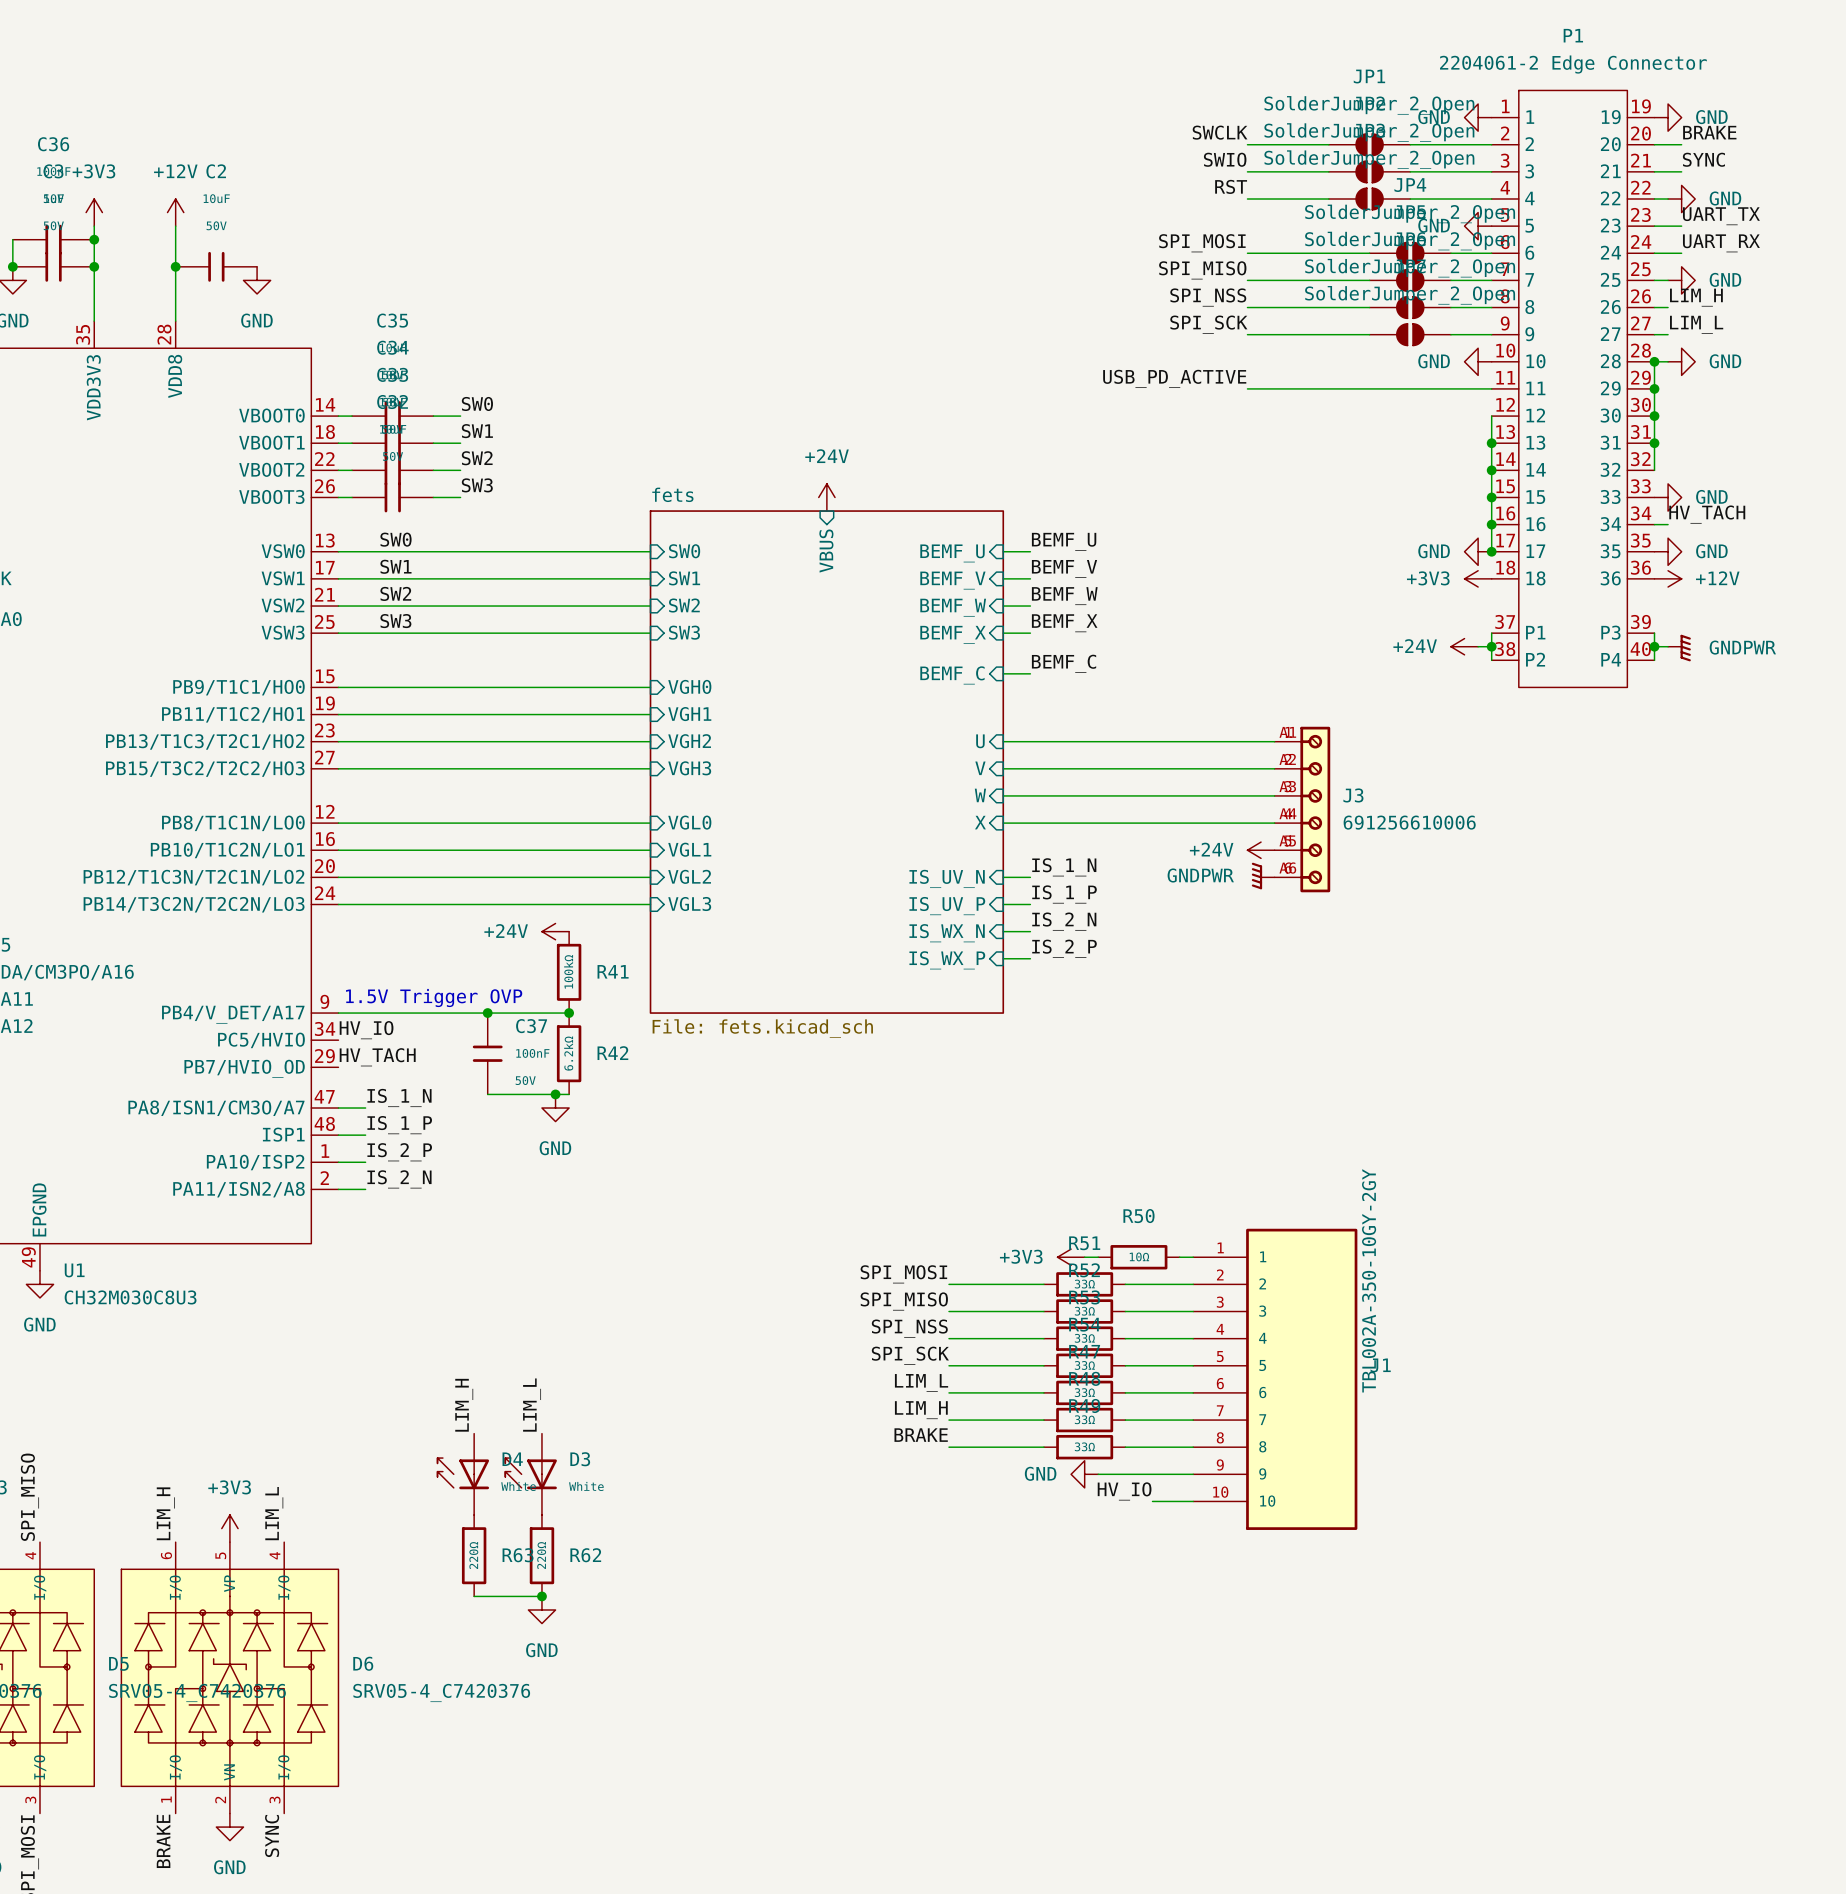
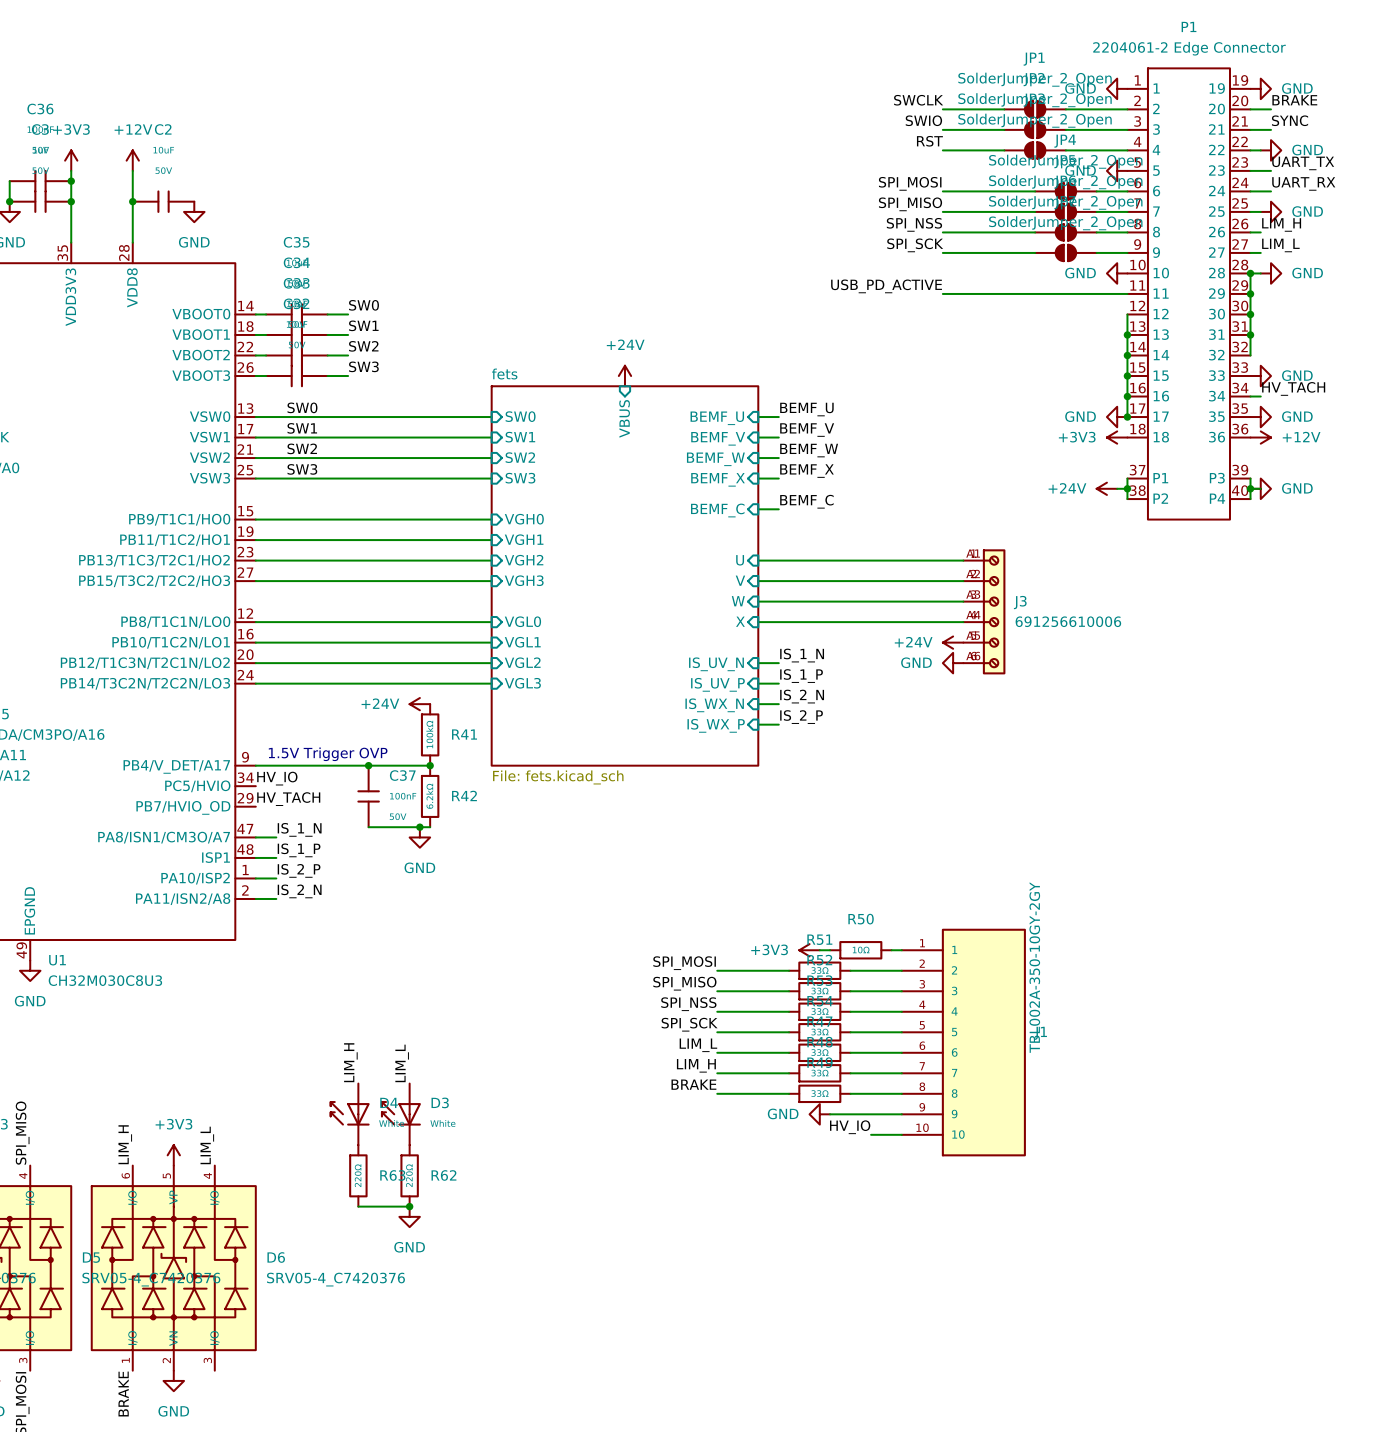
power symbol: none -> GND (1260, 488)
power symbol: GNDPWR (1679, 648) -> none
power symbol: GNDPWR (1263, 876) -> GND (953, 663)
label: SYNC (272, 1836) -> none

